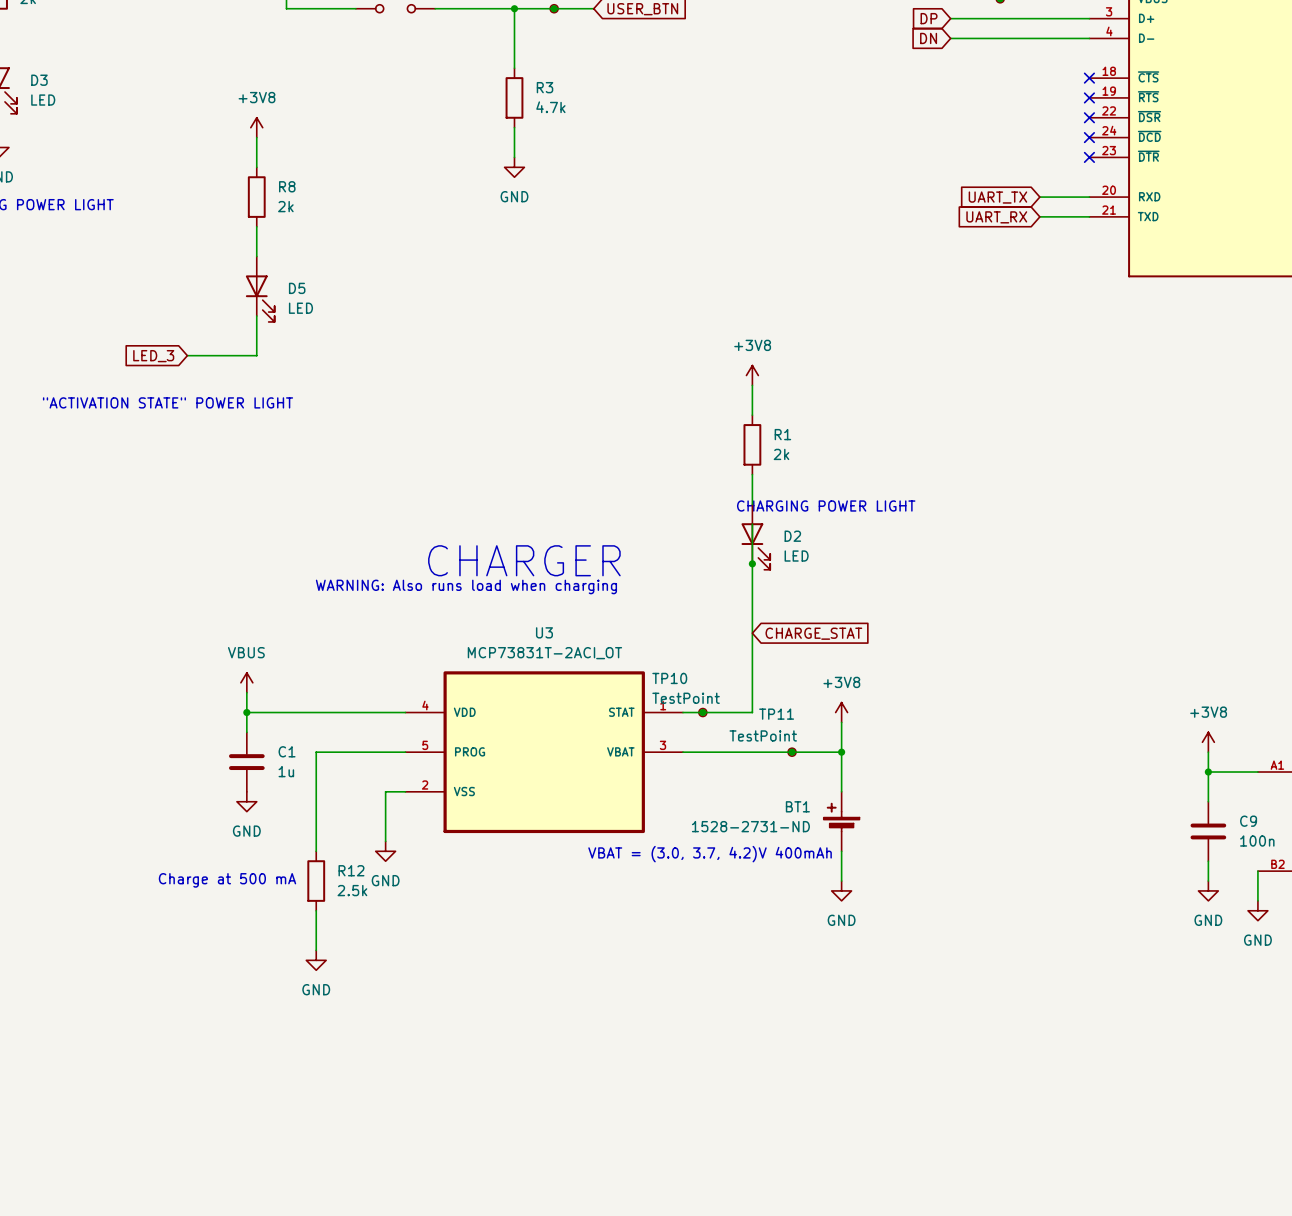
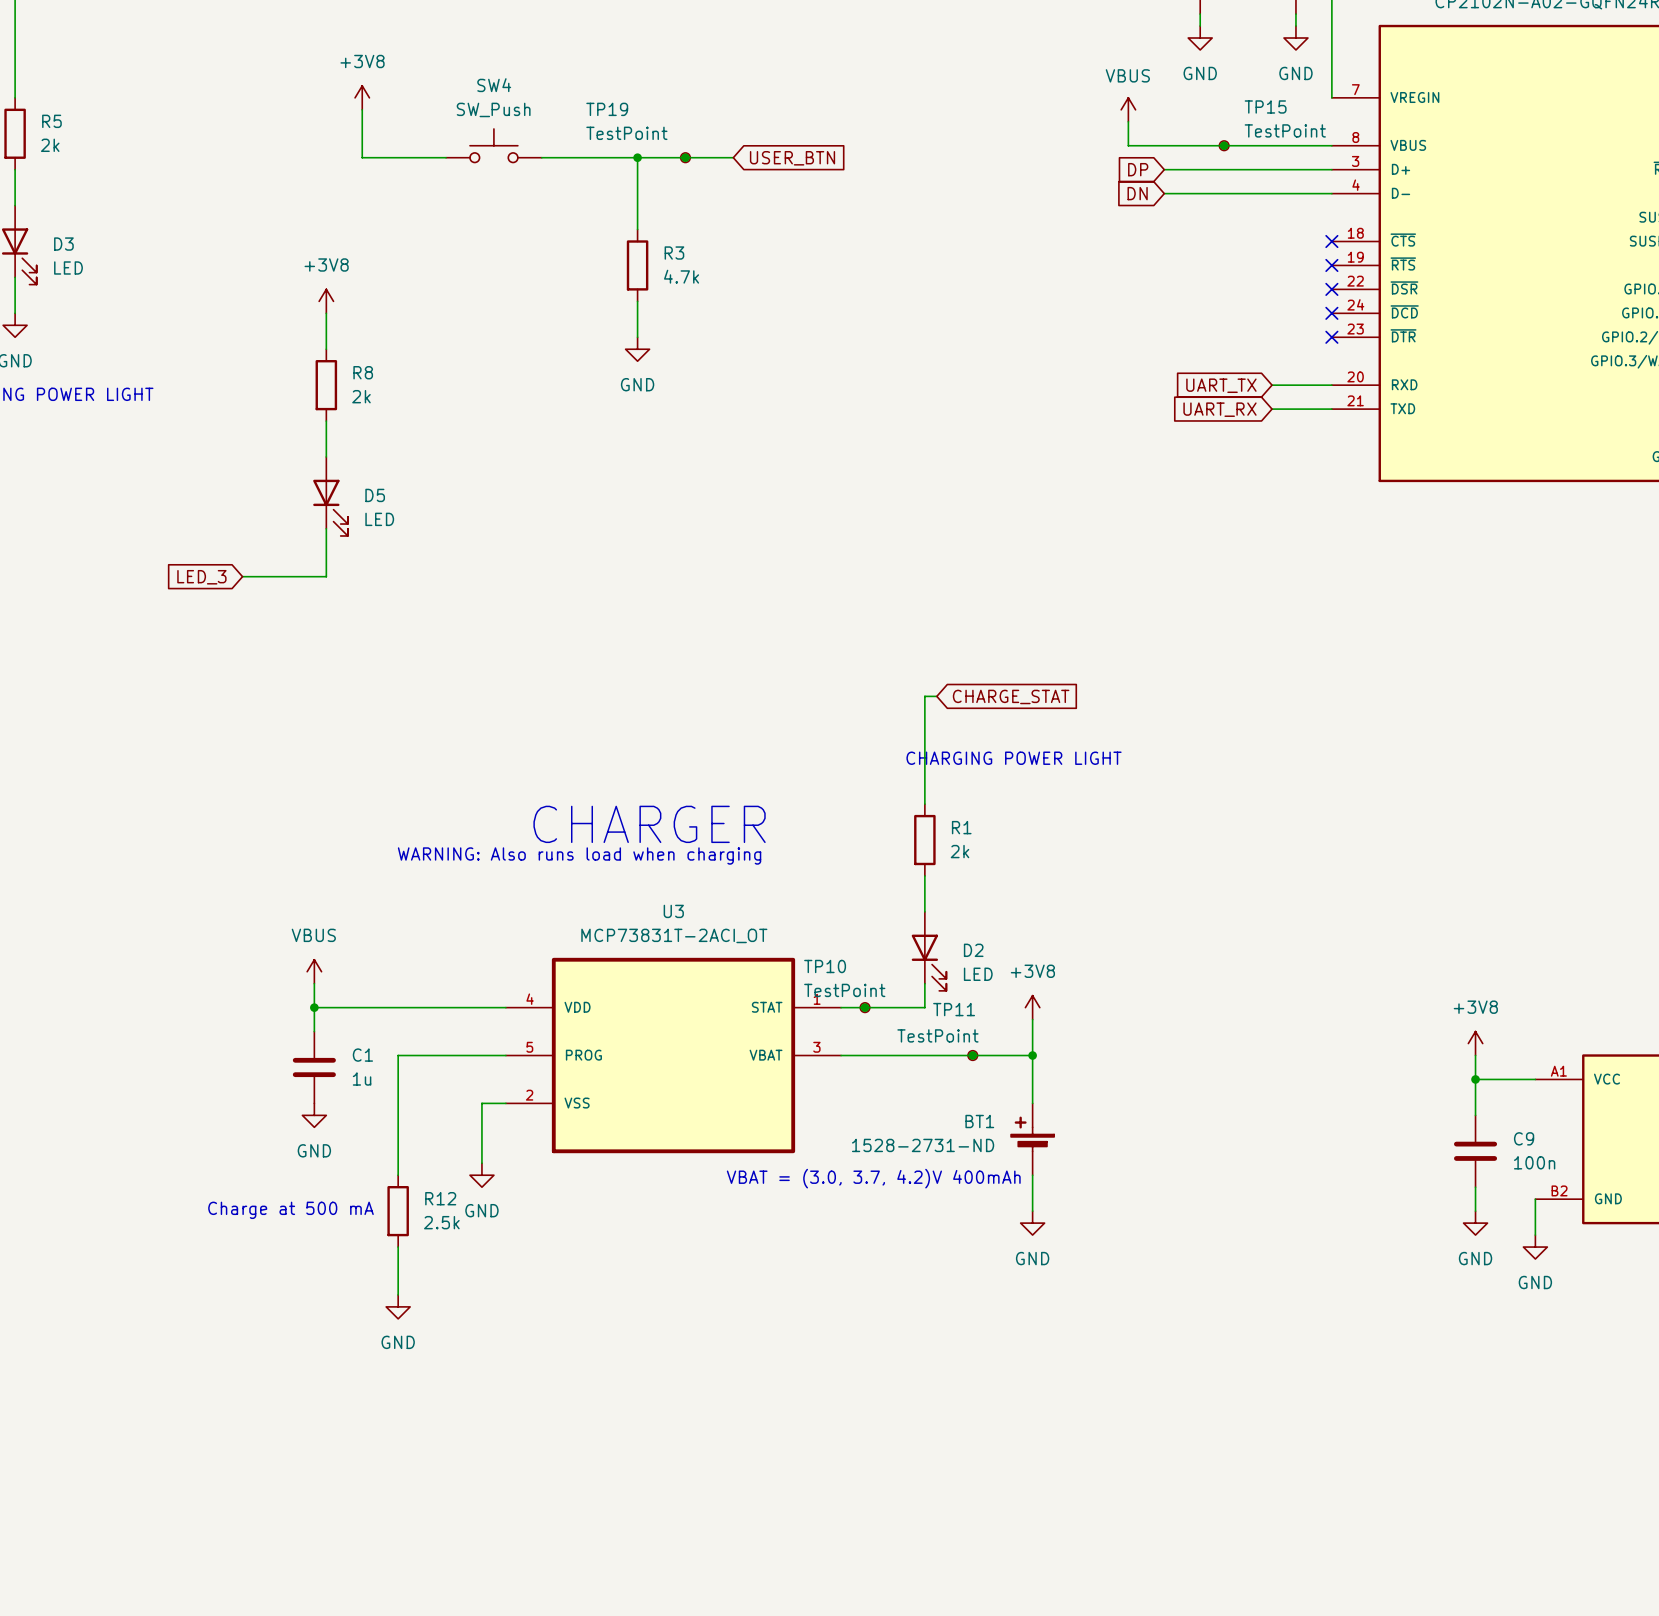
power symbol: +3V8 (752, 375) -> none
wire: (752, 385) (752, 415) -> none
text: "ACTIVATION STATE" POWER LIGHT (168, 402) -> none
R1 position: (752, 444) -> (924, 840)
wire: none -> (936, 696) (924, 696) (924, 720)
D2 position: (755, 537) -> (929, 951)
wire: (752, 544) (752, 603) -> none
junction: (752, 563) -> none
global label position: CHARGE_STAT (813, 633) -> CHARGE_STAT (1011, 696)

